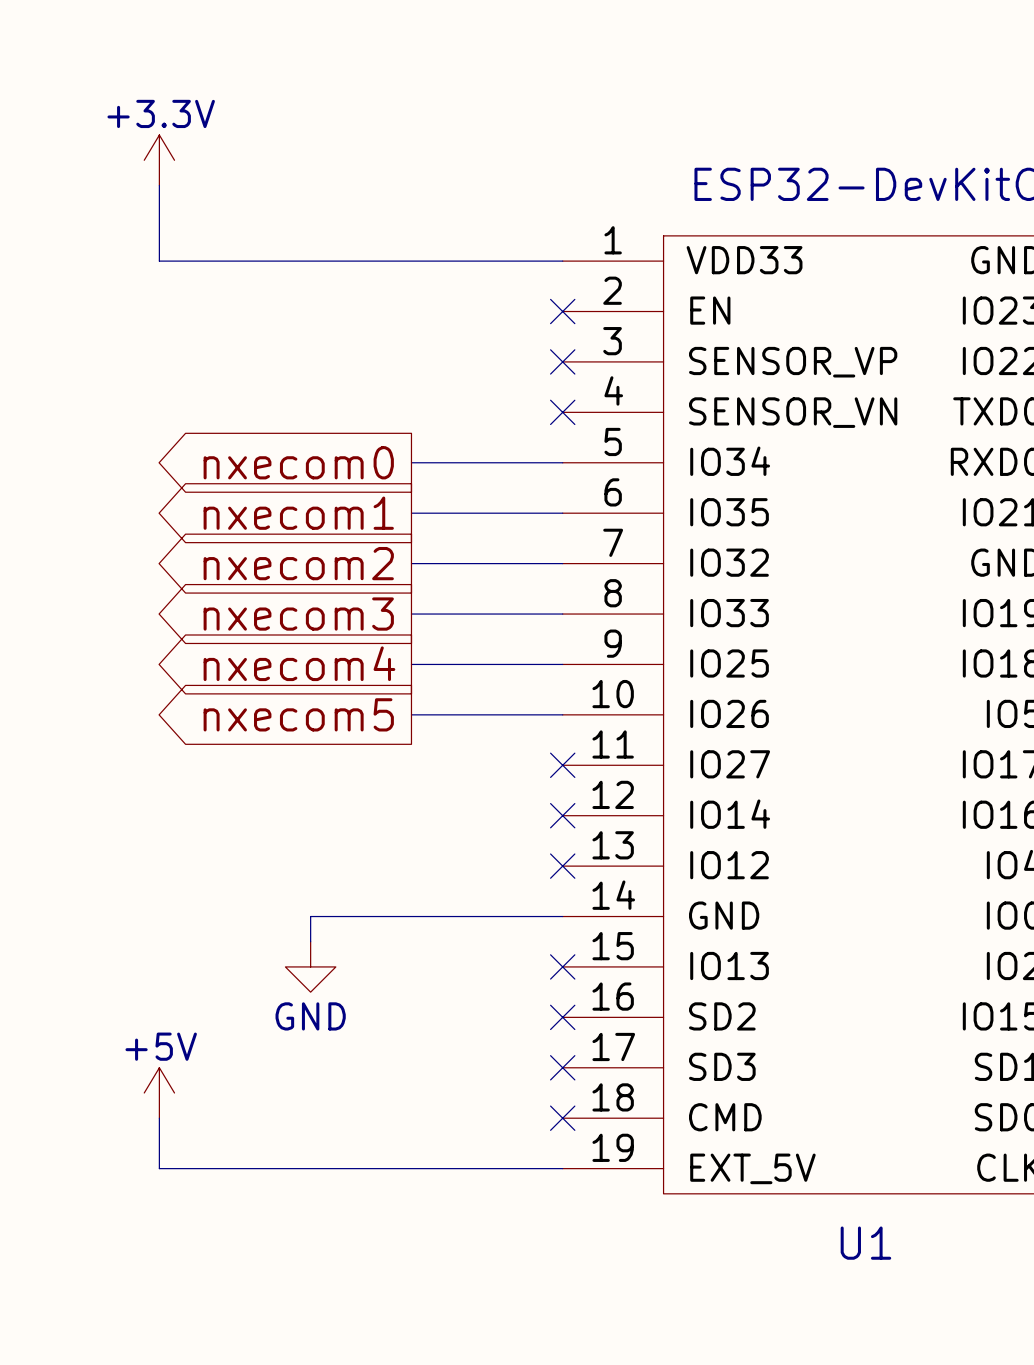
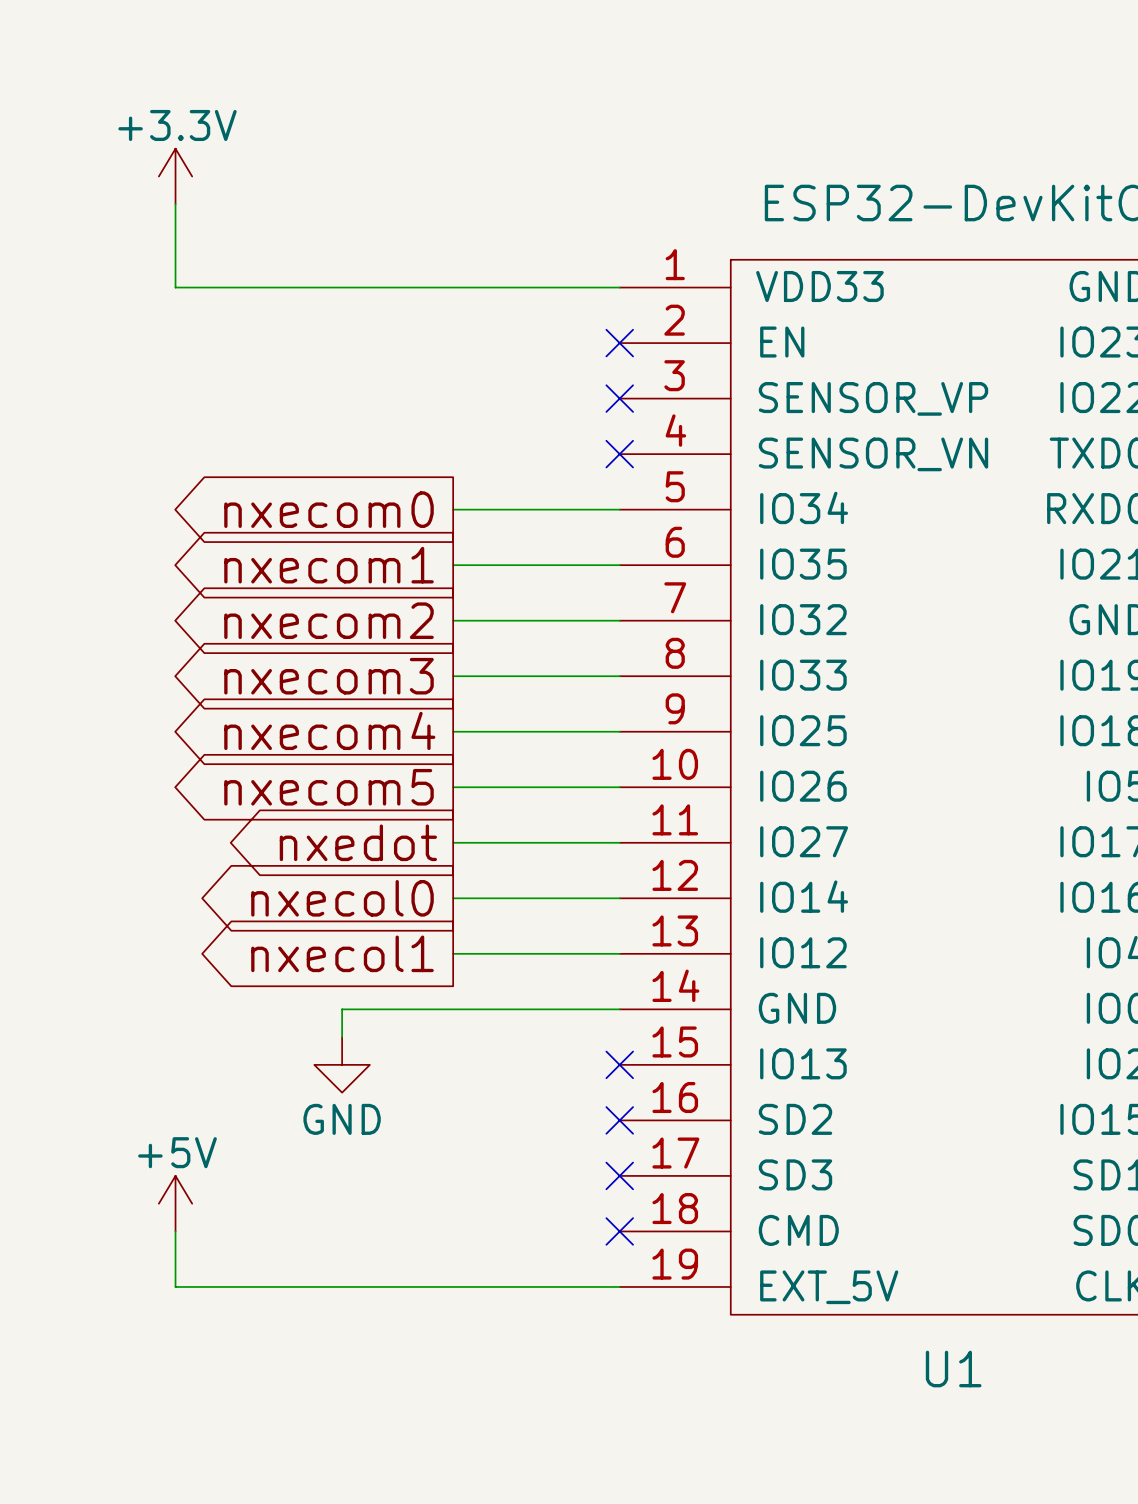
global label: none -> nxedot (358, 842)
wire: none -> (453, 842) (619, 842)
no-connect mark: (562, 765) -> none
global label: none -> nxecol0 (342, 898)
wire: none -> (453, 898) (619, 898)
no-connect mark: (562, 815) -> none
global label: none -> nxecol1 (342, 953)
wire: none -> (453, 953) (619, 953)
no-connect mark: (562, 866) -> none

